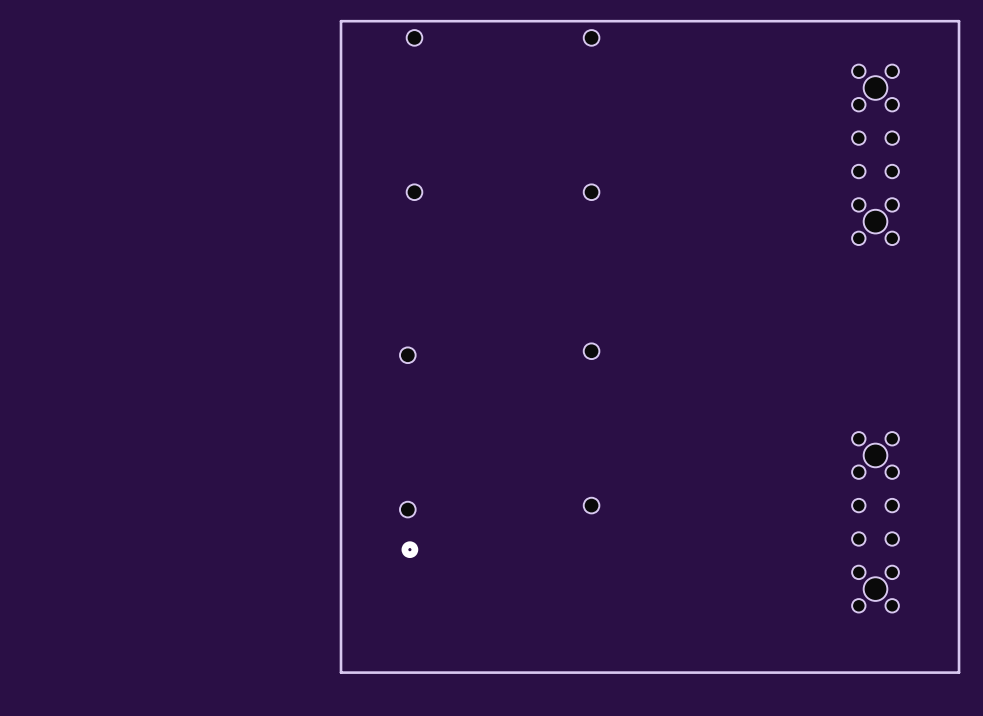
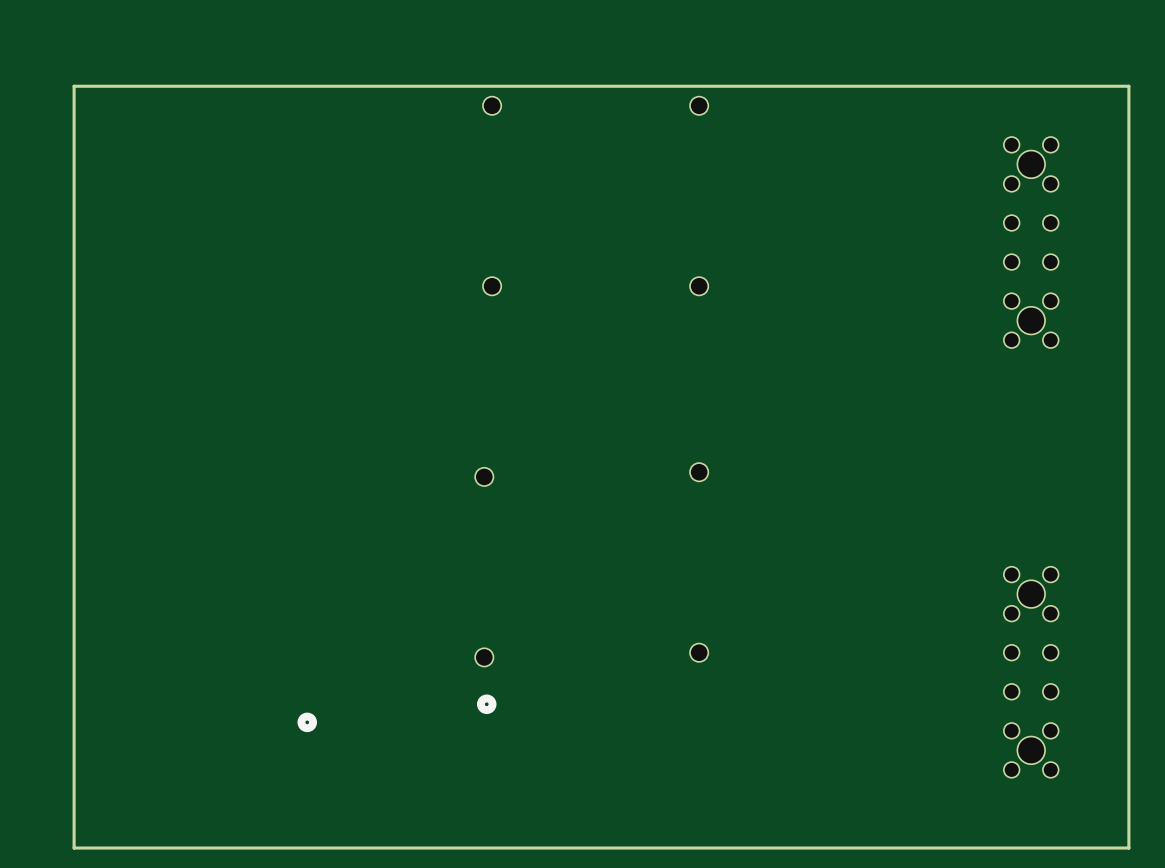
board edge: (341, 21) (341, 672) -> (406, 86) (74, 86) (74, 848) (406, 848)
part: none -> (307, 722)

